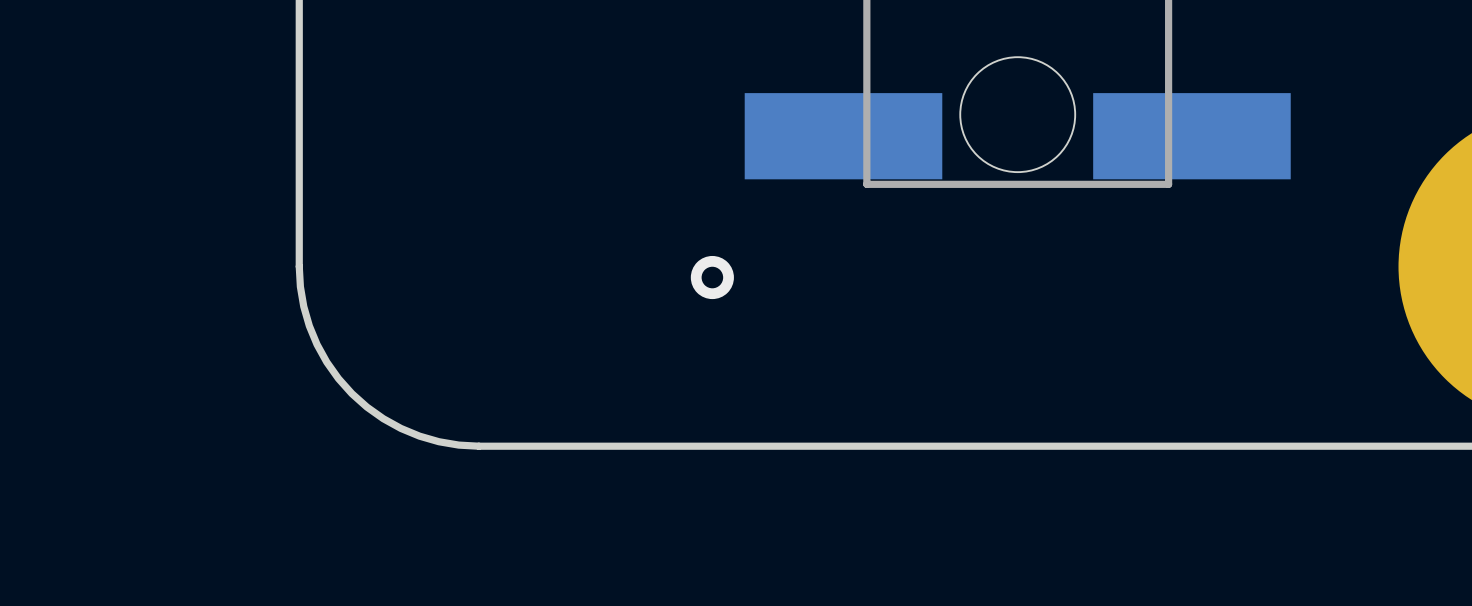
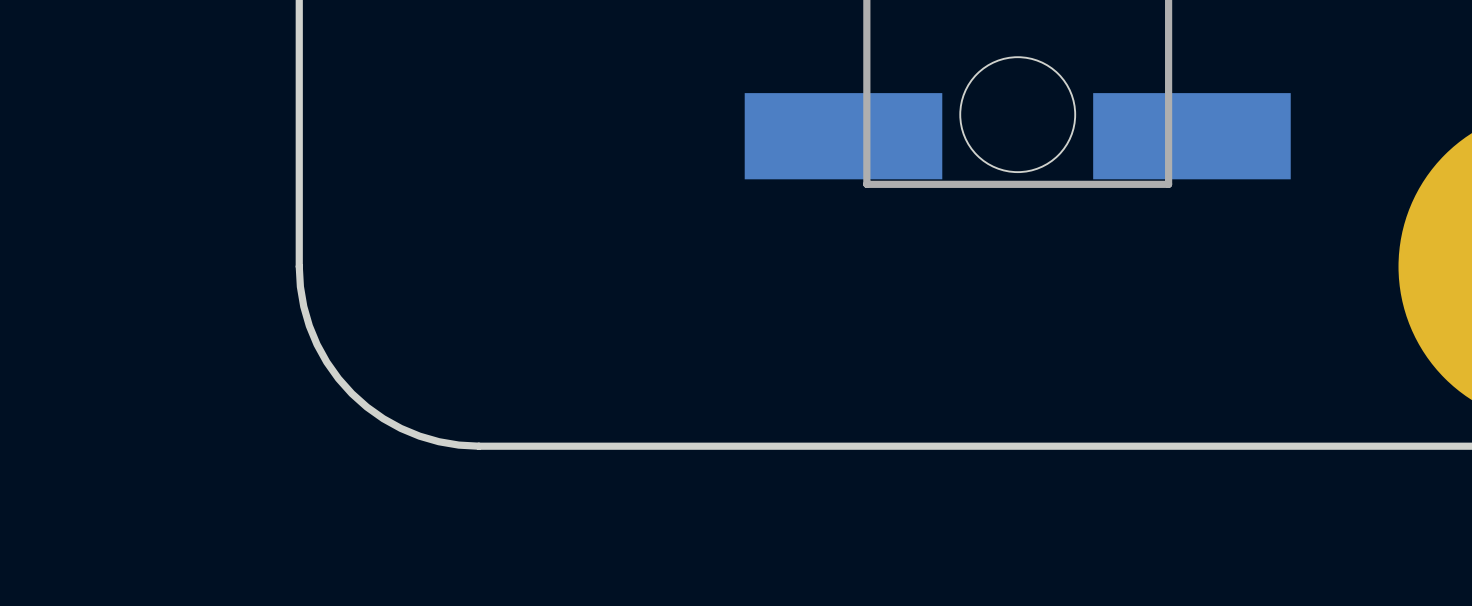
via: (712, 277) -> none

